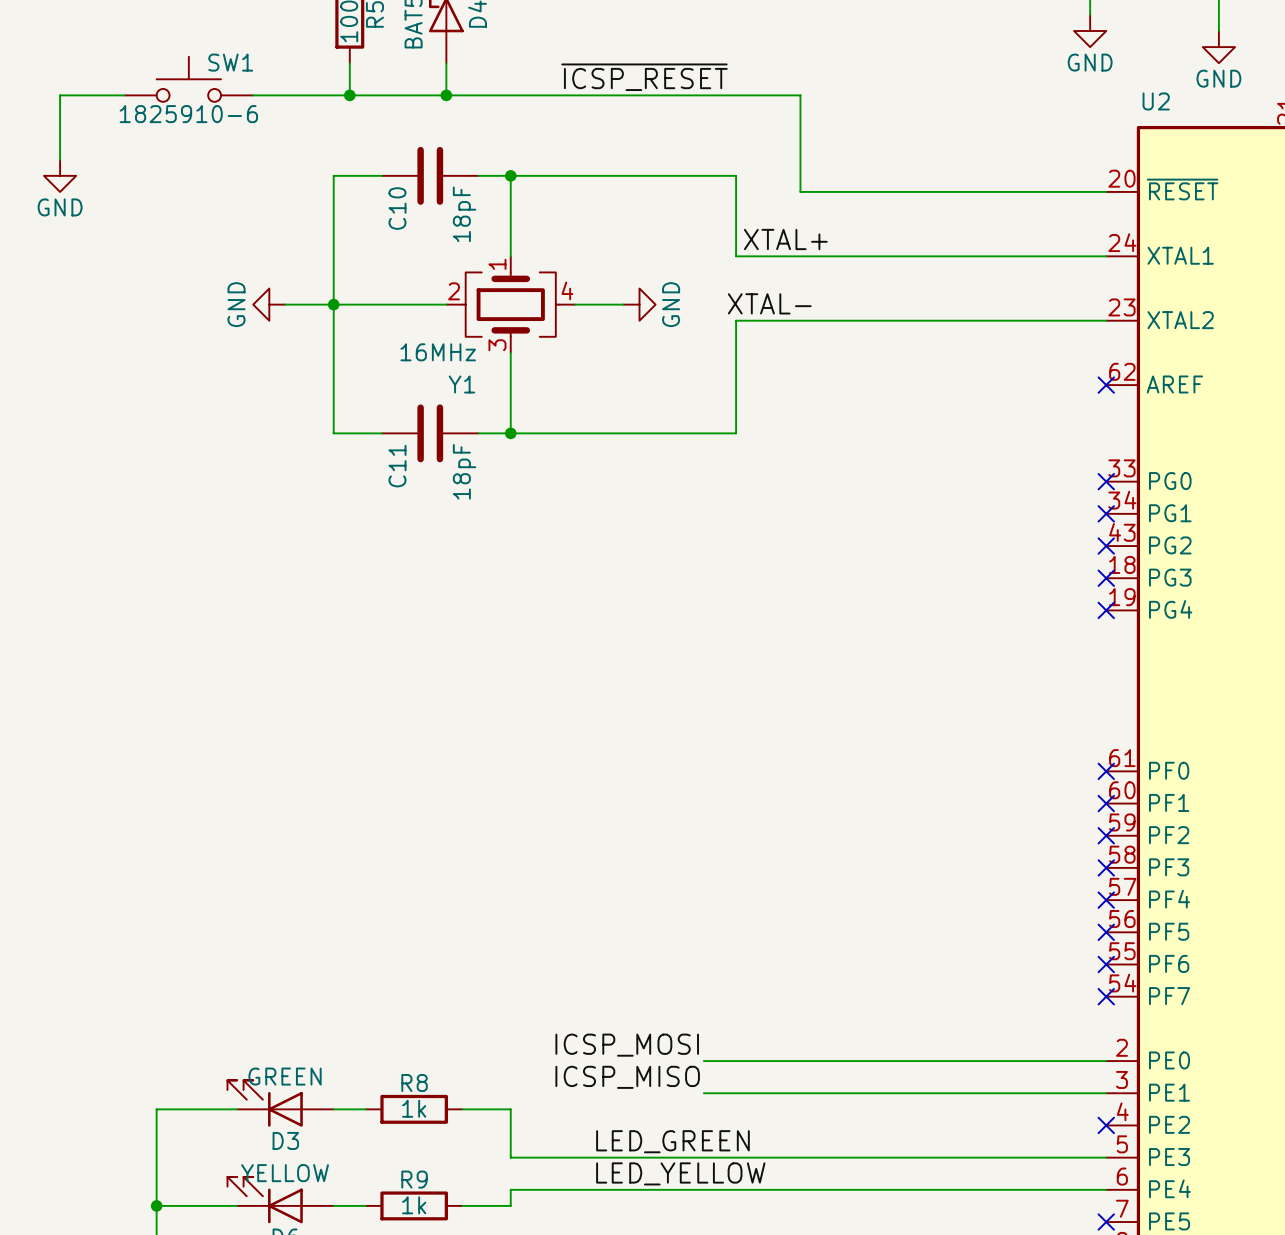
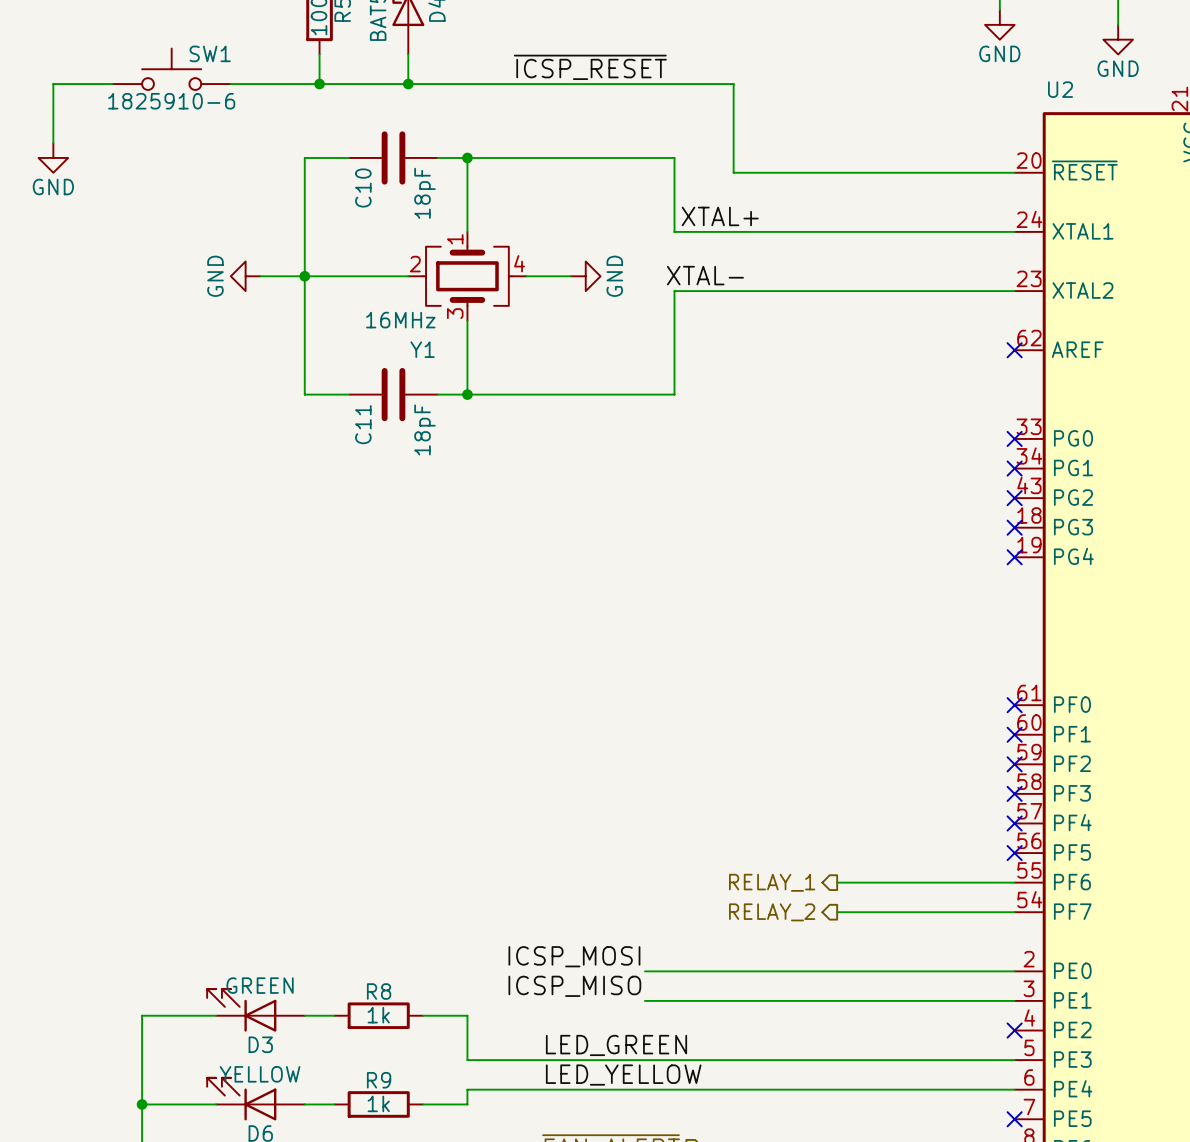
hierarchical label: none -> RELAY_1 (772, 882)
wire: none -> (837, 882) (1014, 882)
no-connect mark: (1106, 964) -> none
hierarchical label: none -> RELAY_2 (772, 912)
wire: none -> (837, 912) (1014, 912)
no-connect mark: (1106, 996) -> none

